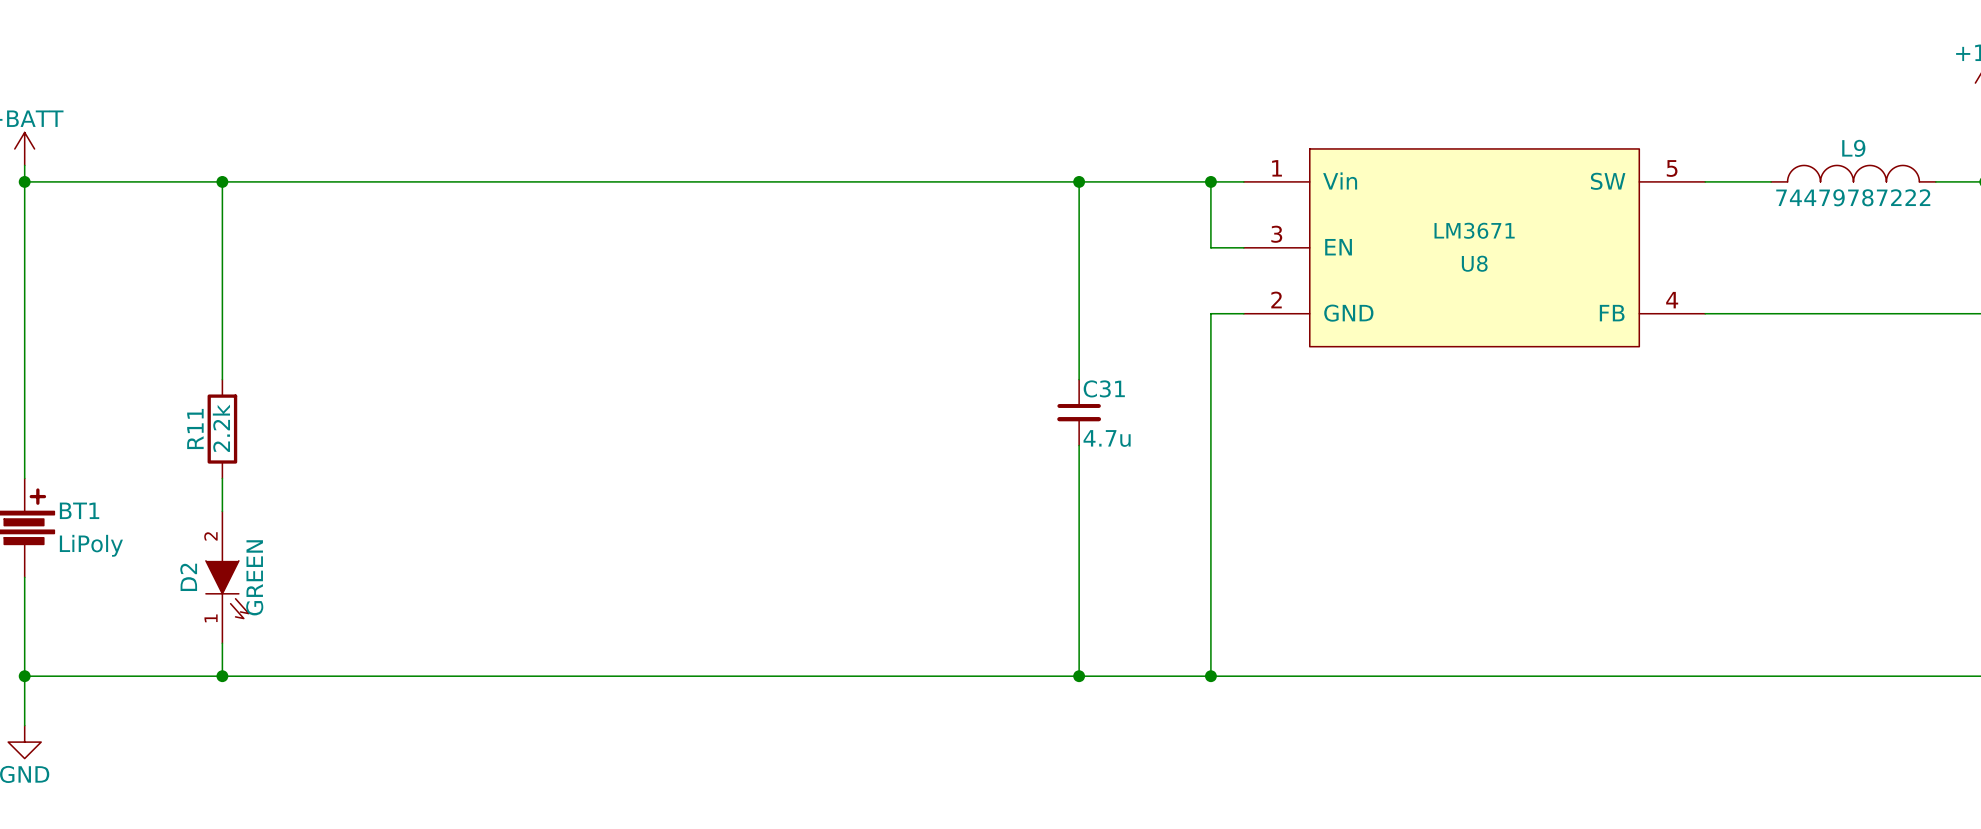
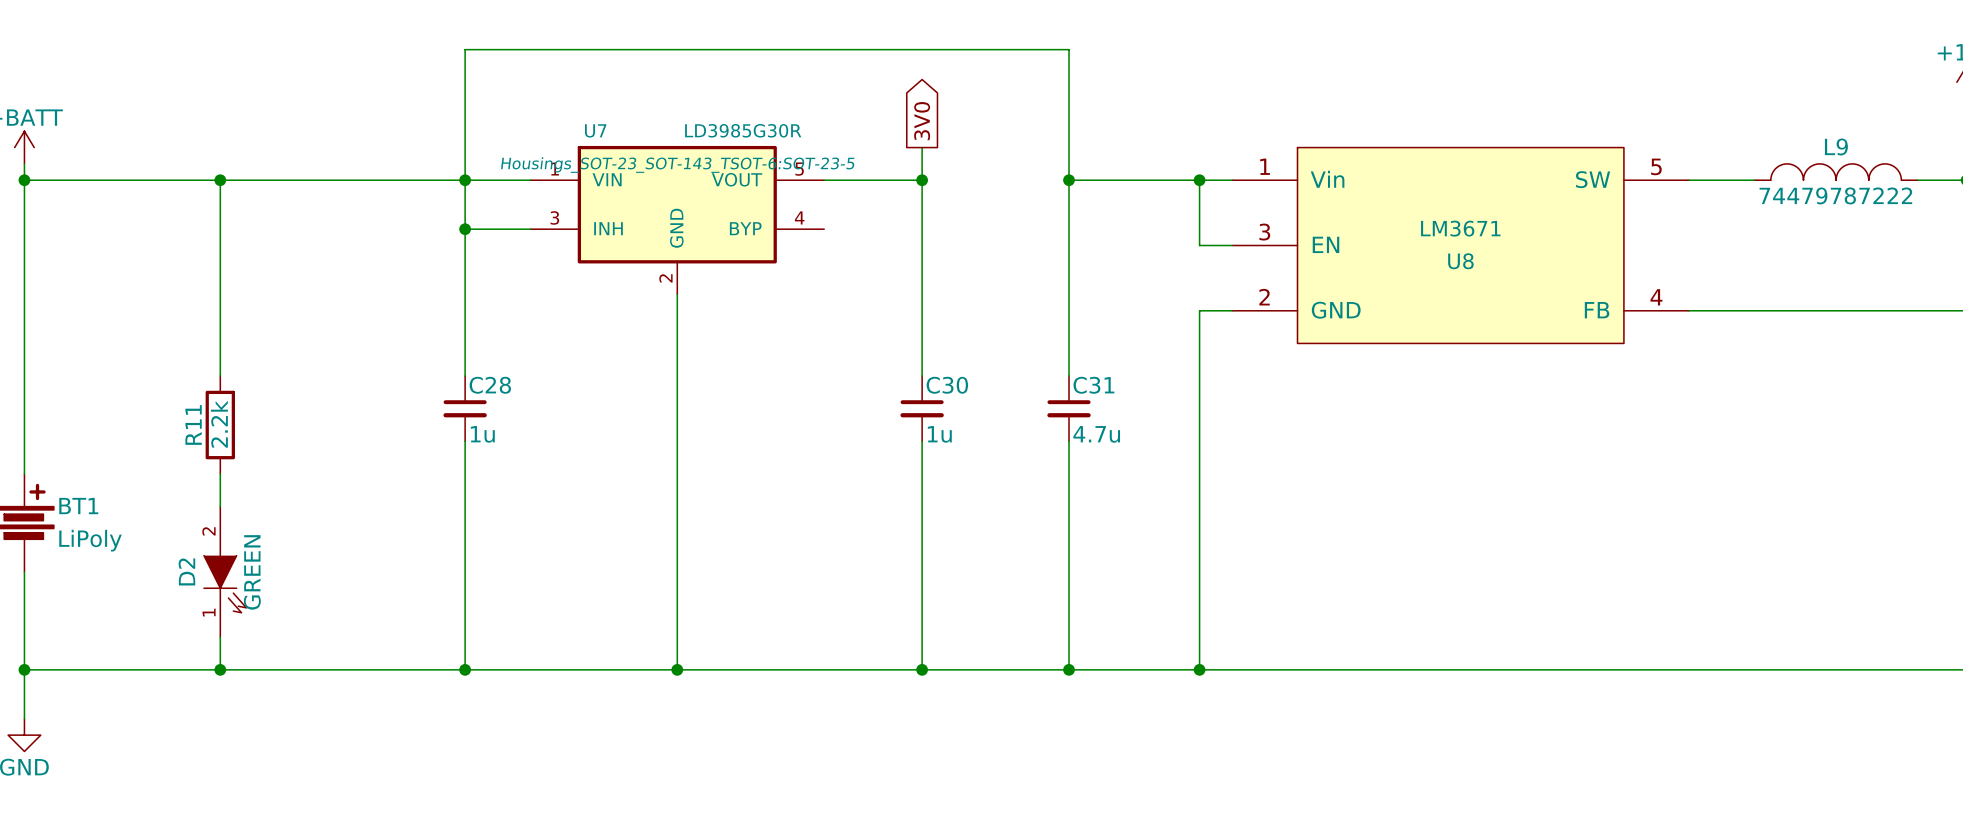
global label: none -> 3V0 (922, 121)
wire: none -> (922, 147) (922, 376)
junction: none -> (465, 180)
wire: (930, 181) (1079, 181) -> (465, 376) (465, 49) (1069, 49) (1069, 180)
junction: none -> (922, 180)
U7: none -> LD3985G30R (677, 220)
wire: none -> (465, 229) (530, 229)
junction: none -> (465, 229)
wire: none -> (677, 294) (677, 669)
C28: none -> 1u (465, 408)
C30: none -> 1u (922, 408)
wire: none -> (465, 441) (465, 669)
wire: none -> (922, 441) (922, 669)
junction: none -> (465, 669)
junction: none -> (677, 669)
junction: none -> (922, 669)

